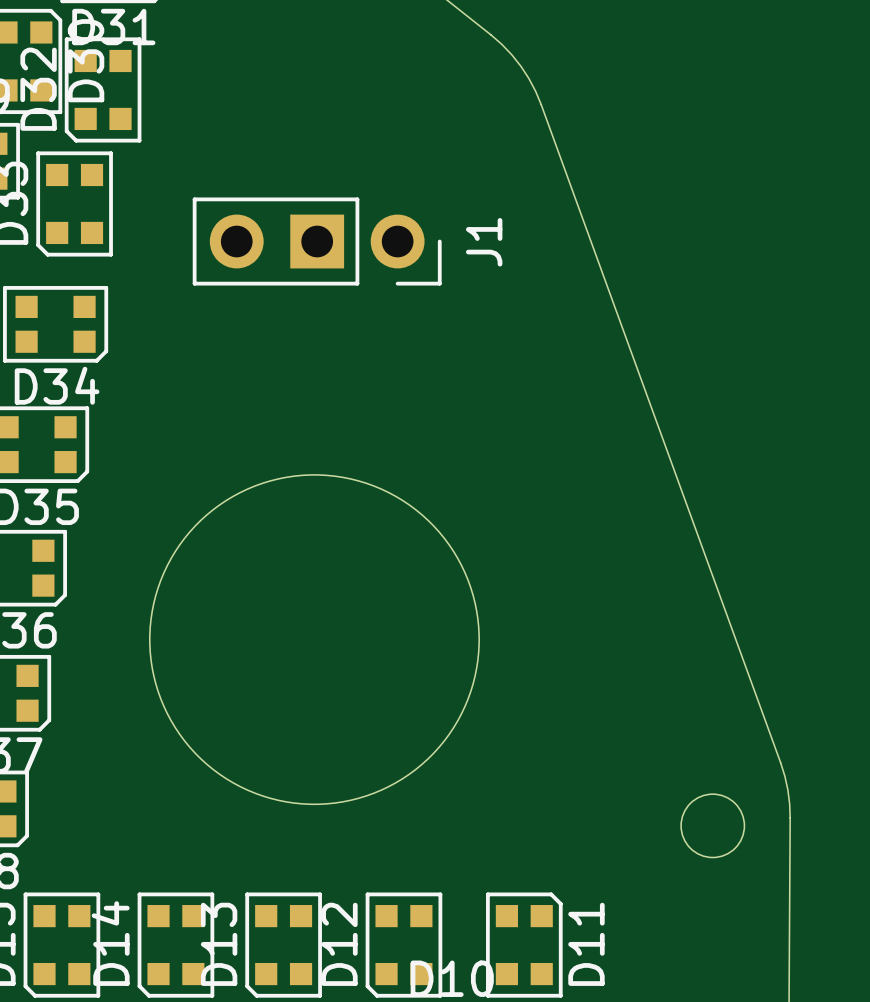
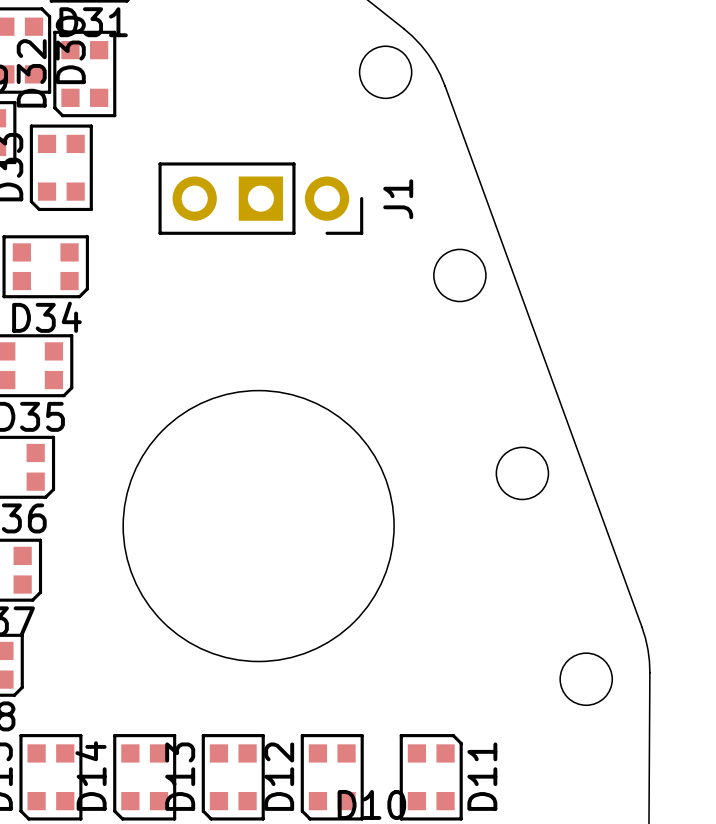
round board edge: none -> [358, 45, 413, 99]
round board edge: none -> [433, 248, 487, 303]
round board edge: none -> [495, 446, 550, 501]

